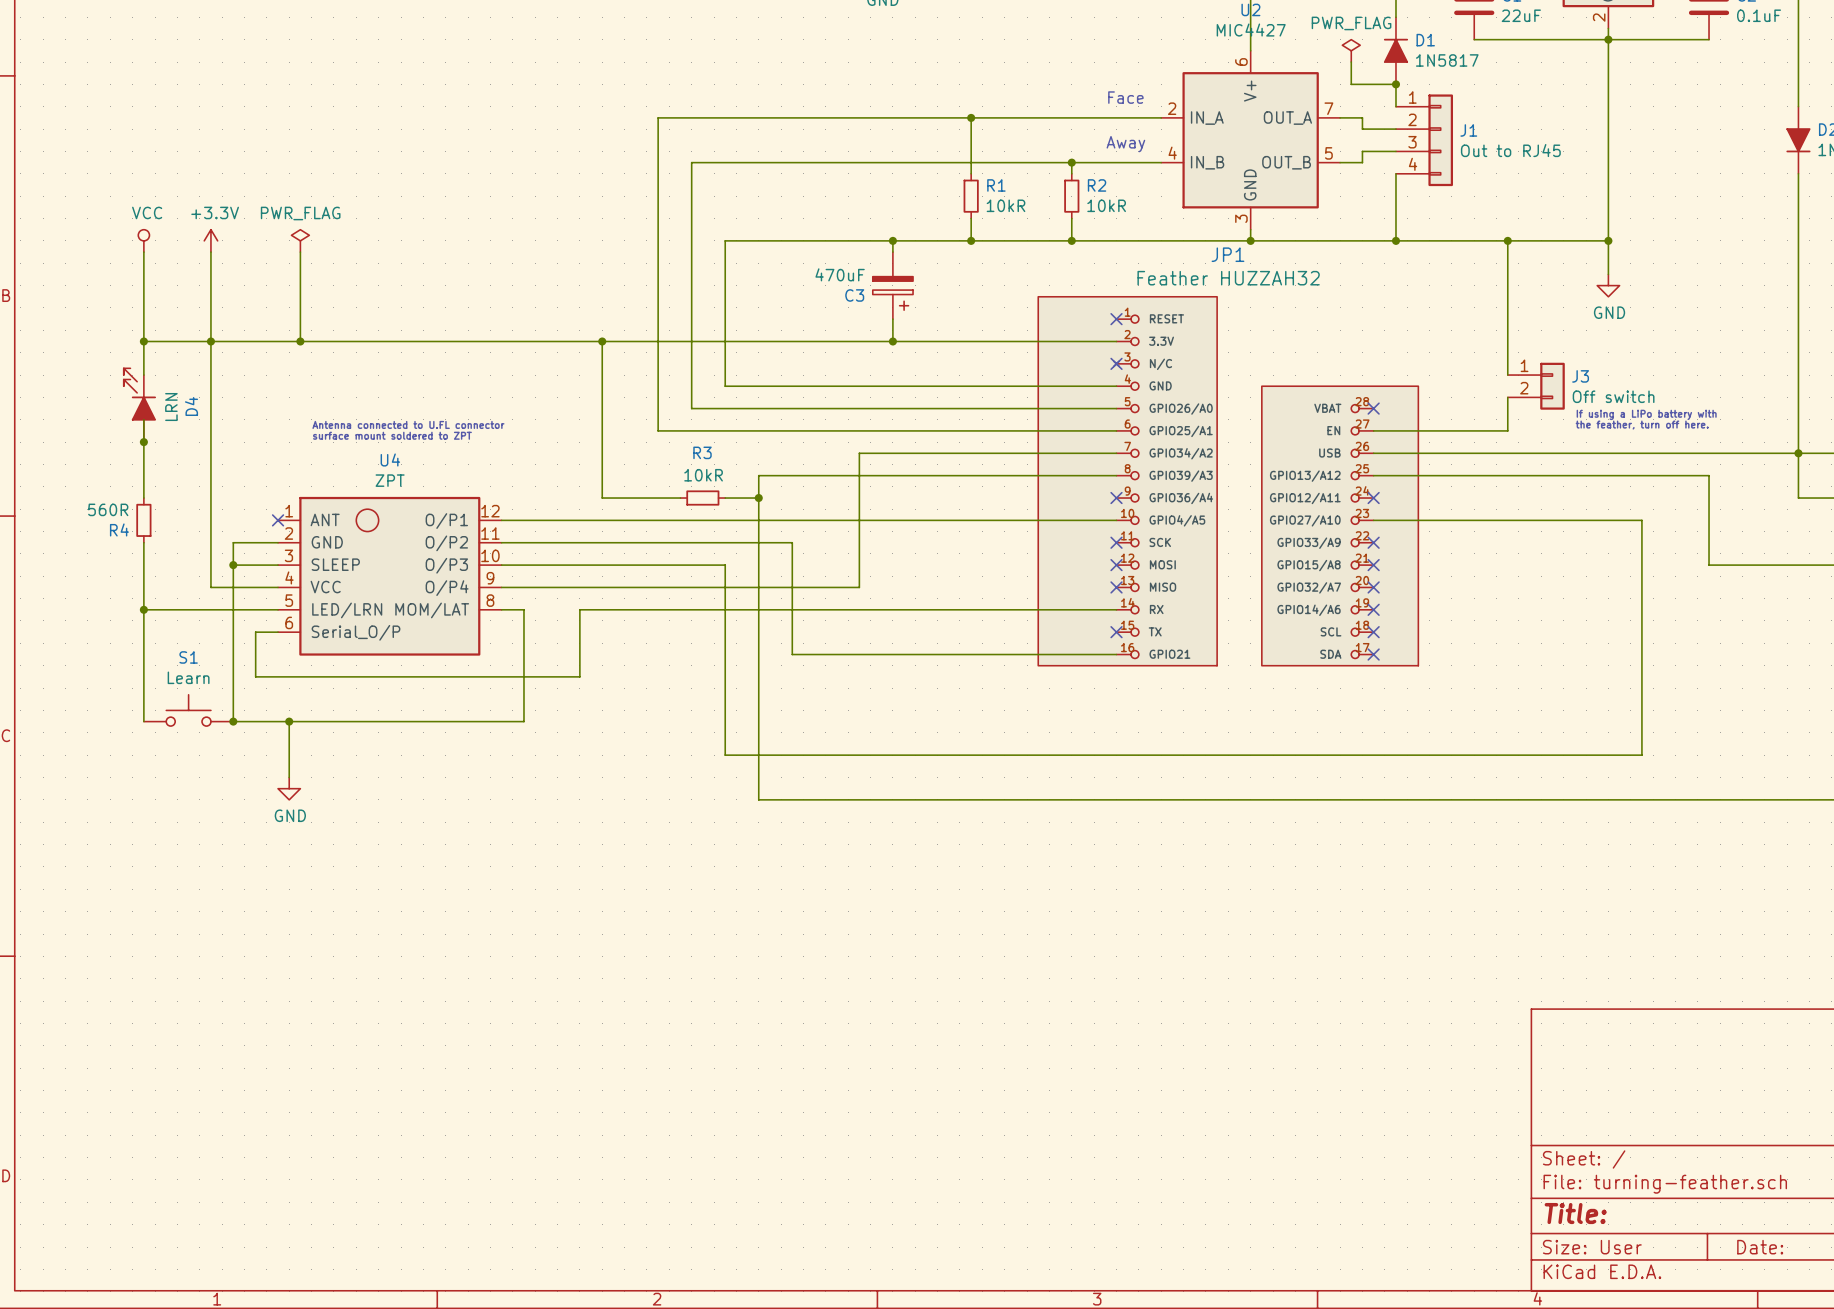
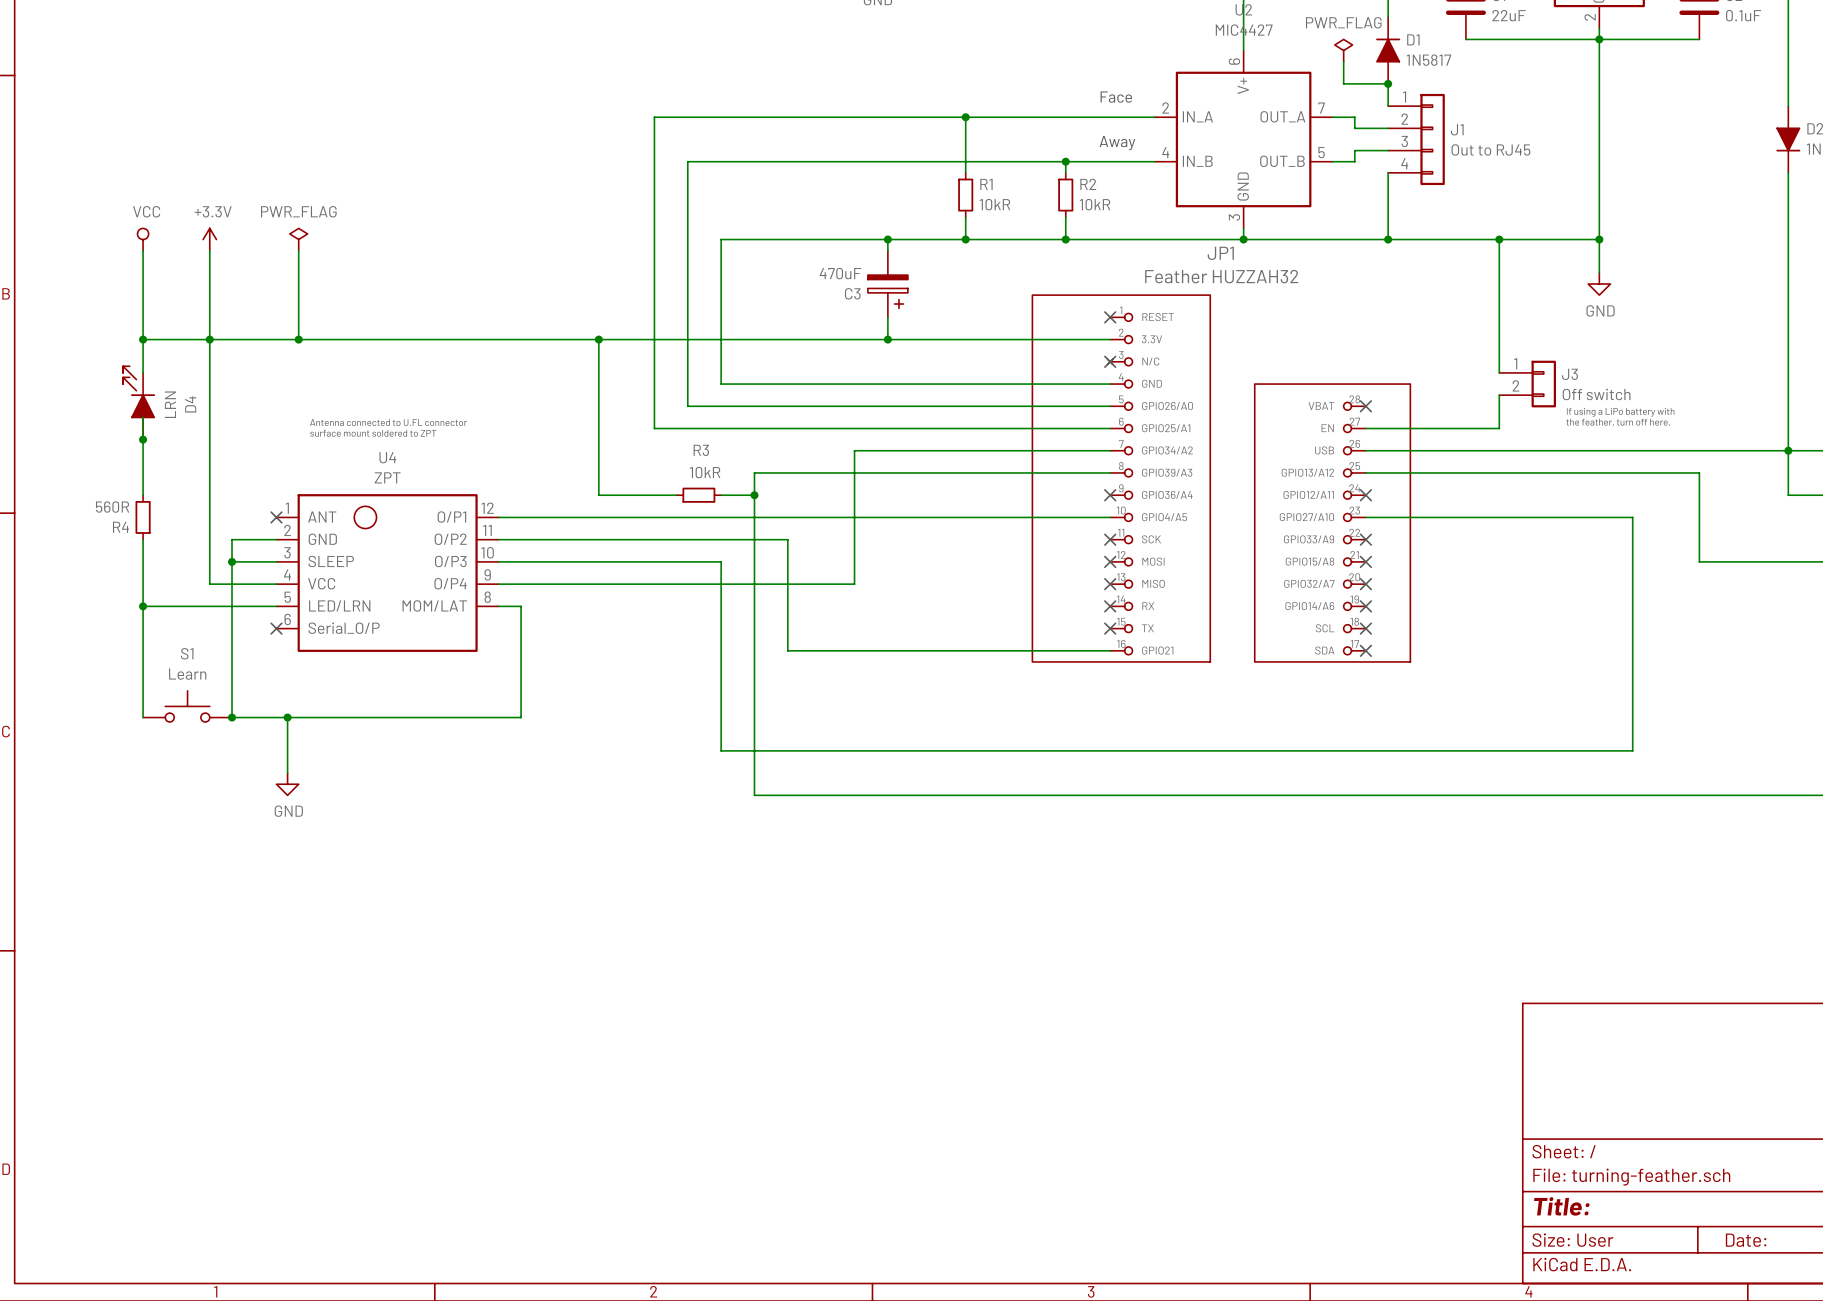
wire: (1116, 609) (579, 609) (579, 676) (255, 676) (255, 632) (278, 632) -> none
no-connect mark: none -> (1110, 606)
no-connect mark: none -> (276, 628)

